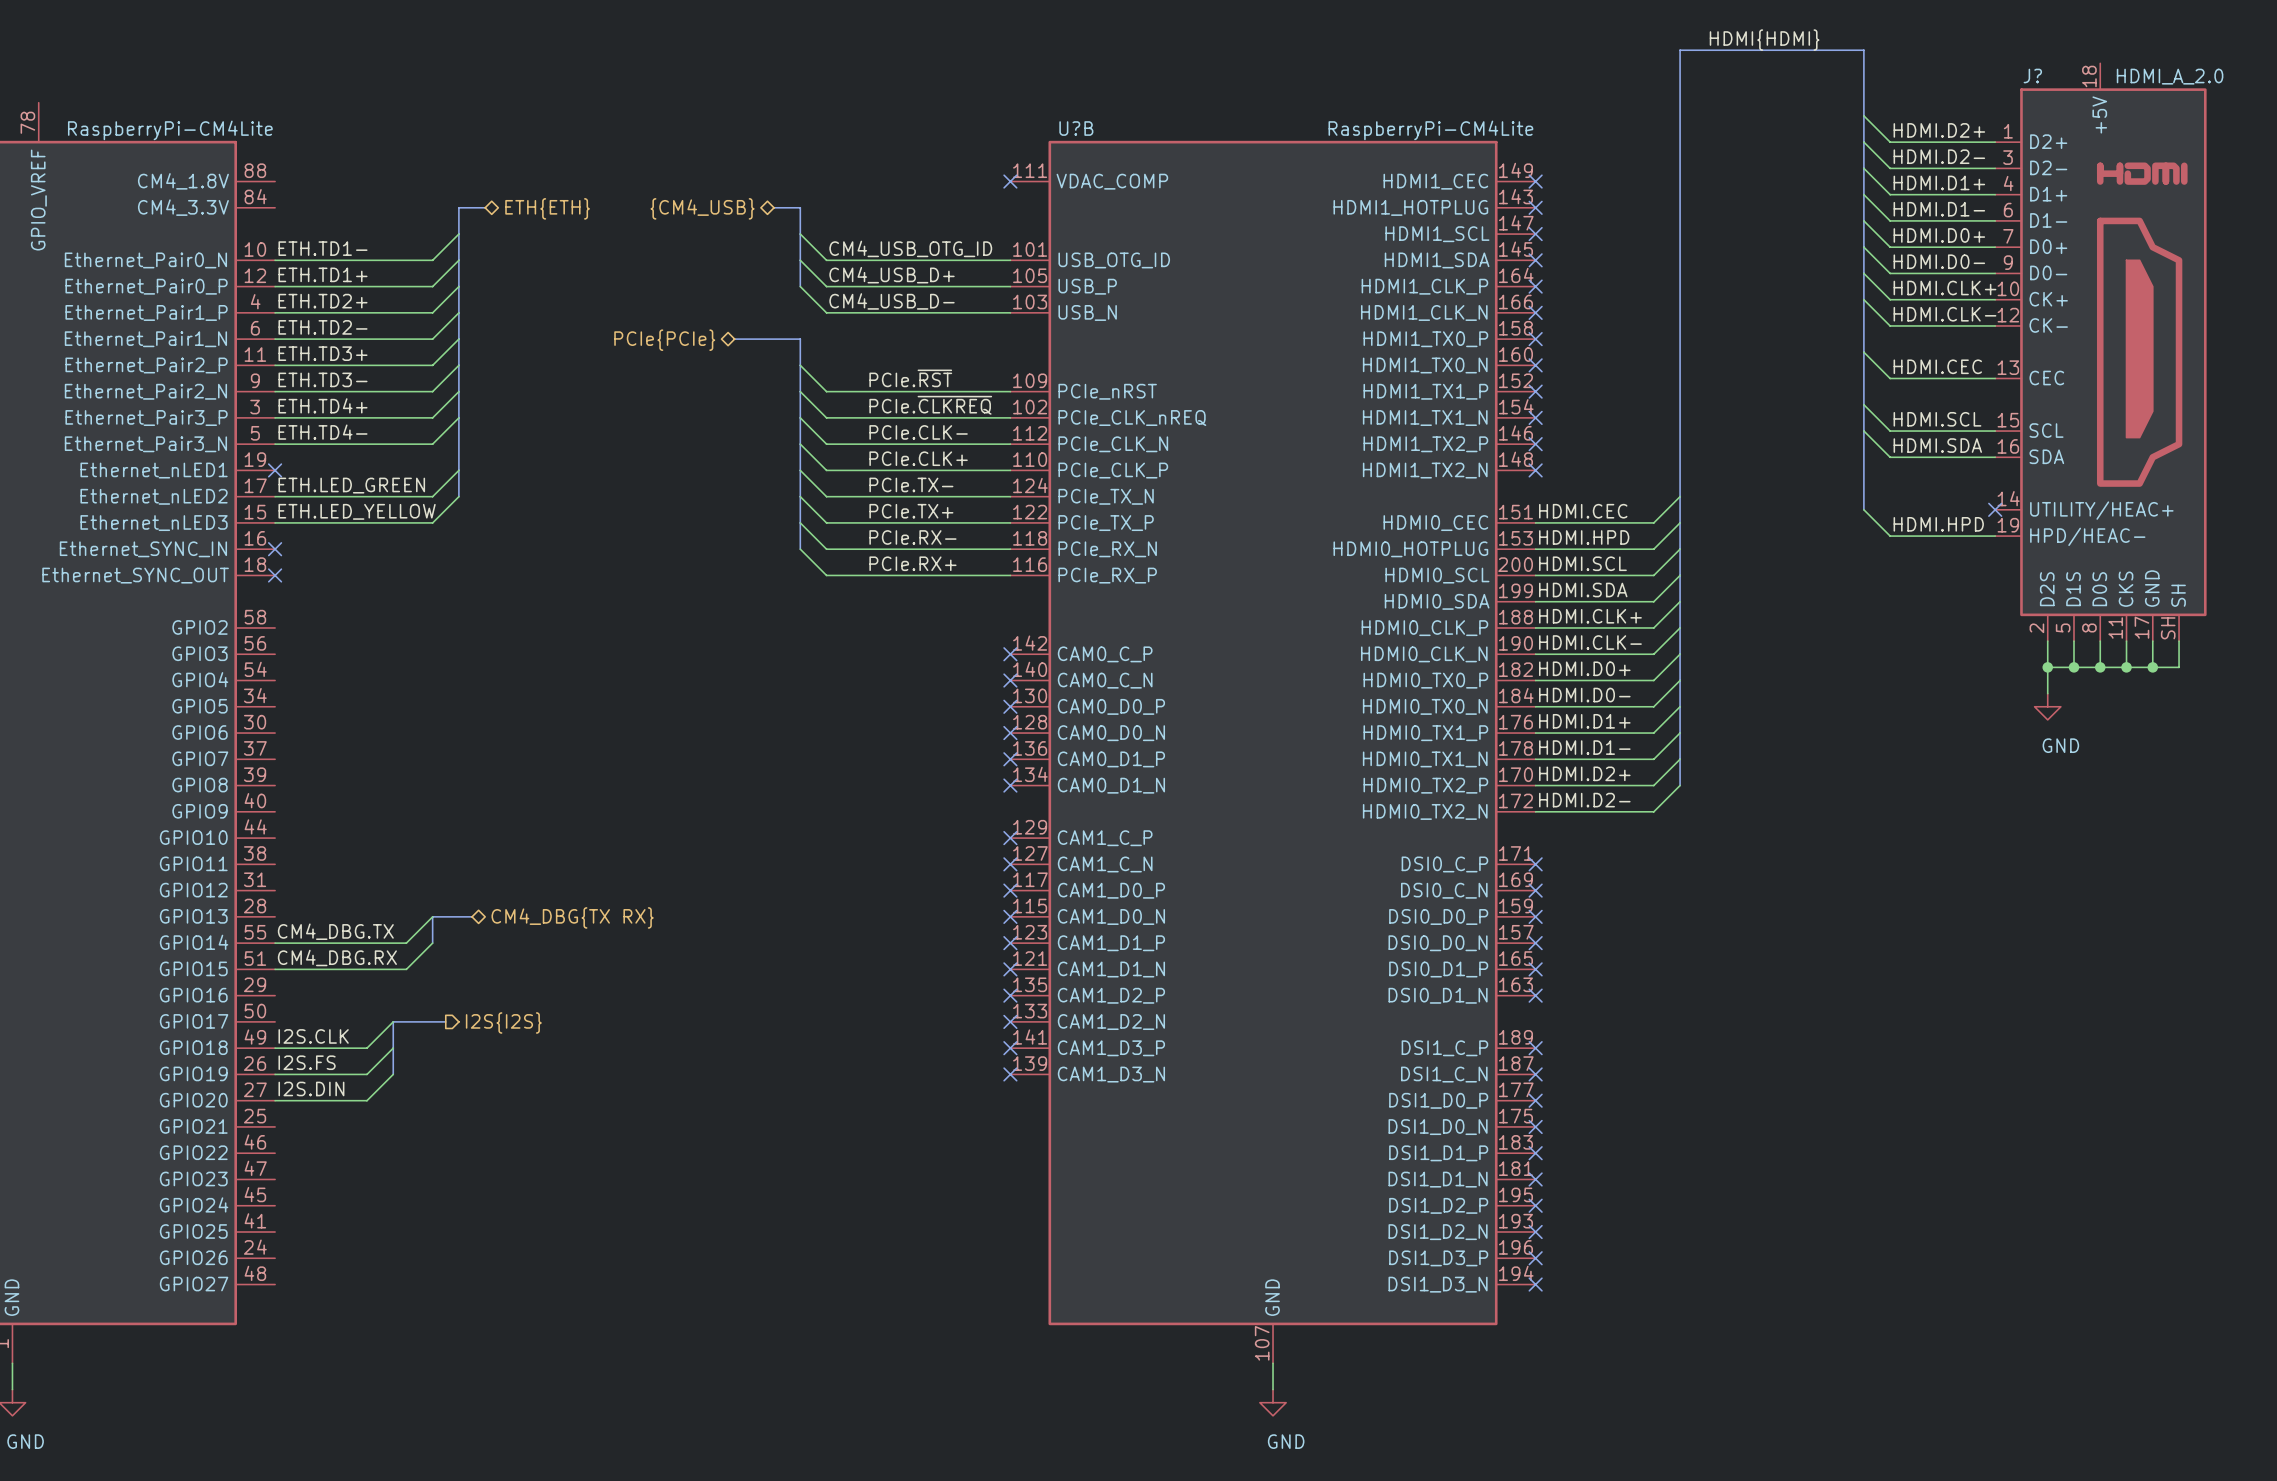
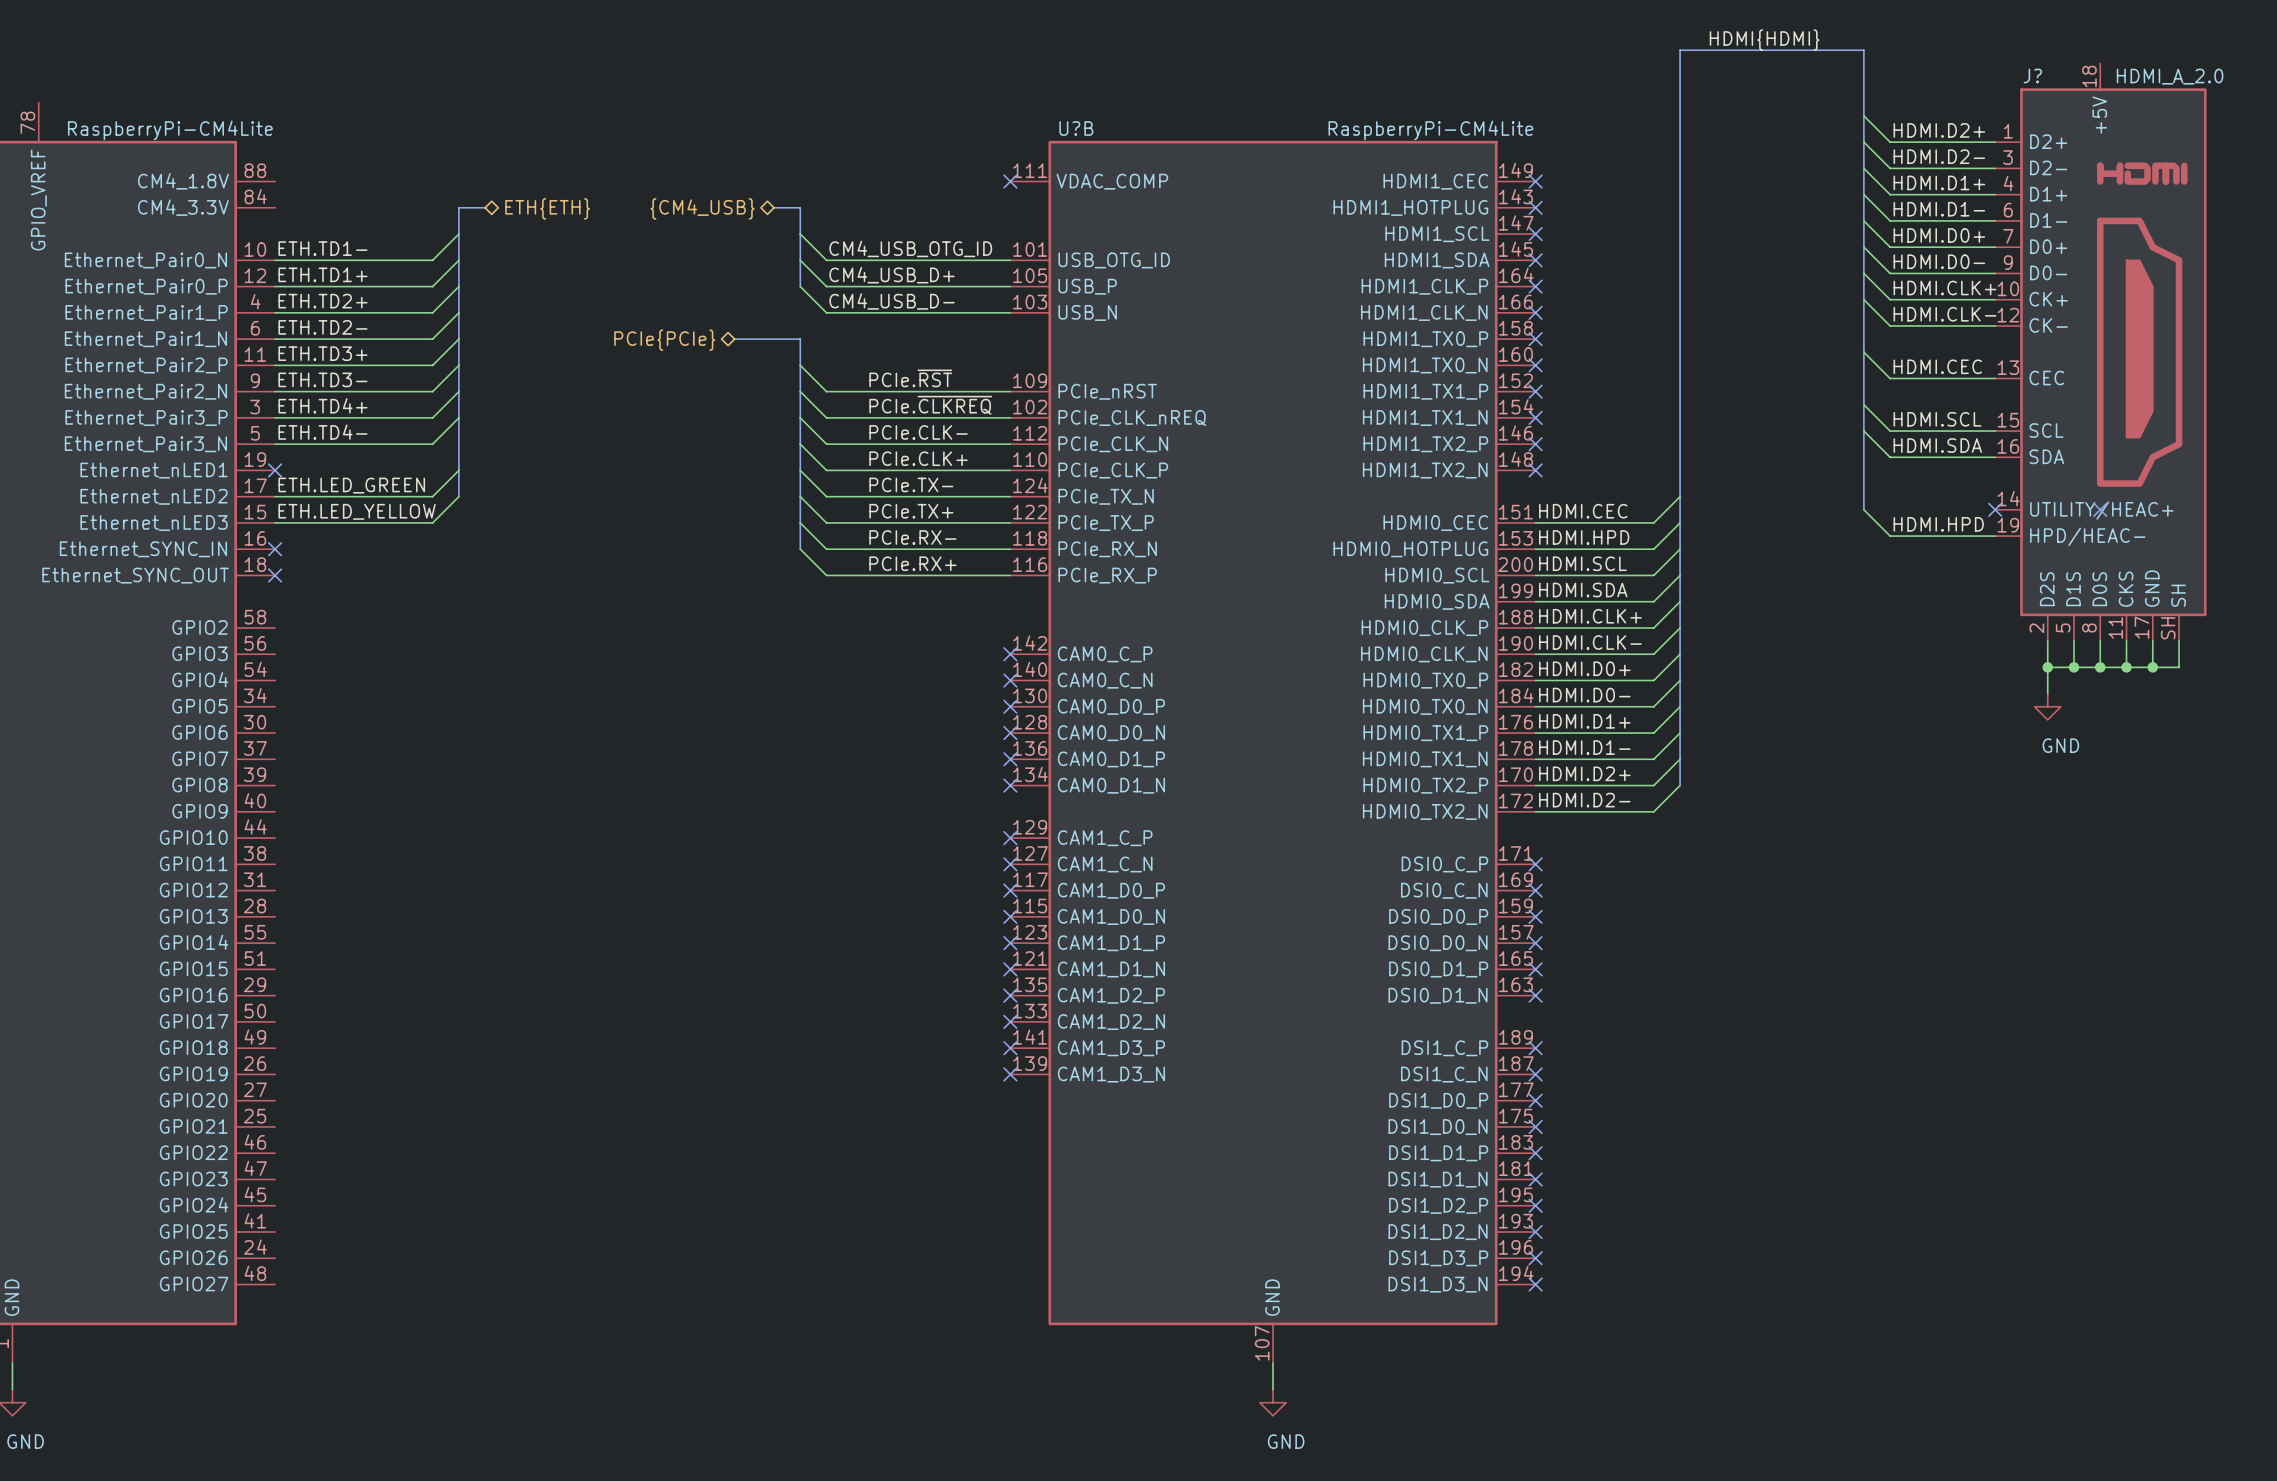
no-connect mark: none -> (2100, 509)
wire: (432, 916) (406, 943) (275, 943) -> none
bus: (472, 916) (432, 916) (432, 943) -> none
hierarchical label: CM4_DBG{TX RX} (572, 917) -> none
label: CM4_DBG.TX (335, 931) -> none
wire: (432, 943) (406, 969) (275, 969) -> none
label: CM4_DBG.RX (337, 957) -> none
wire: (393, 1021) (366, 1048) (275, 1048) -> none
bus: (445, 1021) (393, 1021) (393, 1074) -> none
hierarchical label: I2S{I2S} (503, 1022) -> none
label: I2S.CLK (313, 1036) -> none
wire: (393, 1048) (366, 1074) (275, 1074) -> none
label: I2S.FS (307, 1062) -> none
wire: (393, 1074) (366, 1100) (275, 1100) -> none
label: I2S.DIN (311, 1088) -> none

